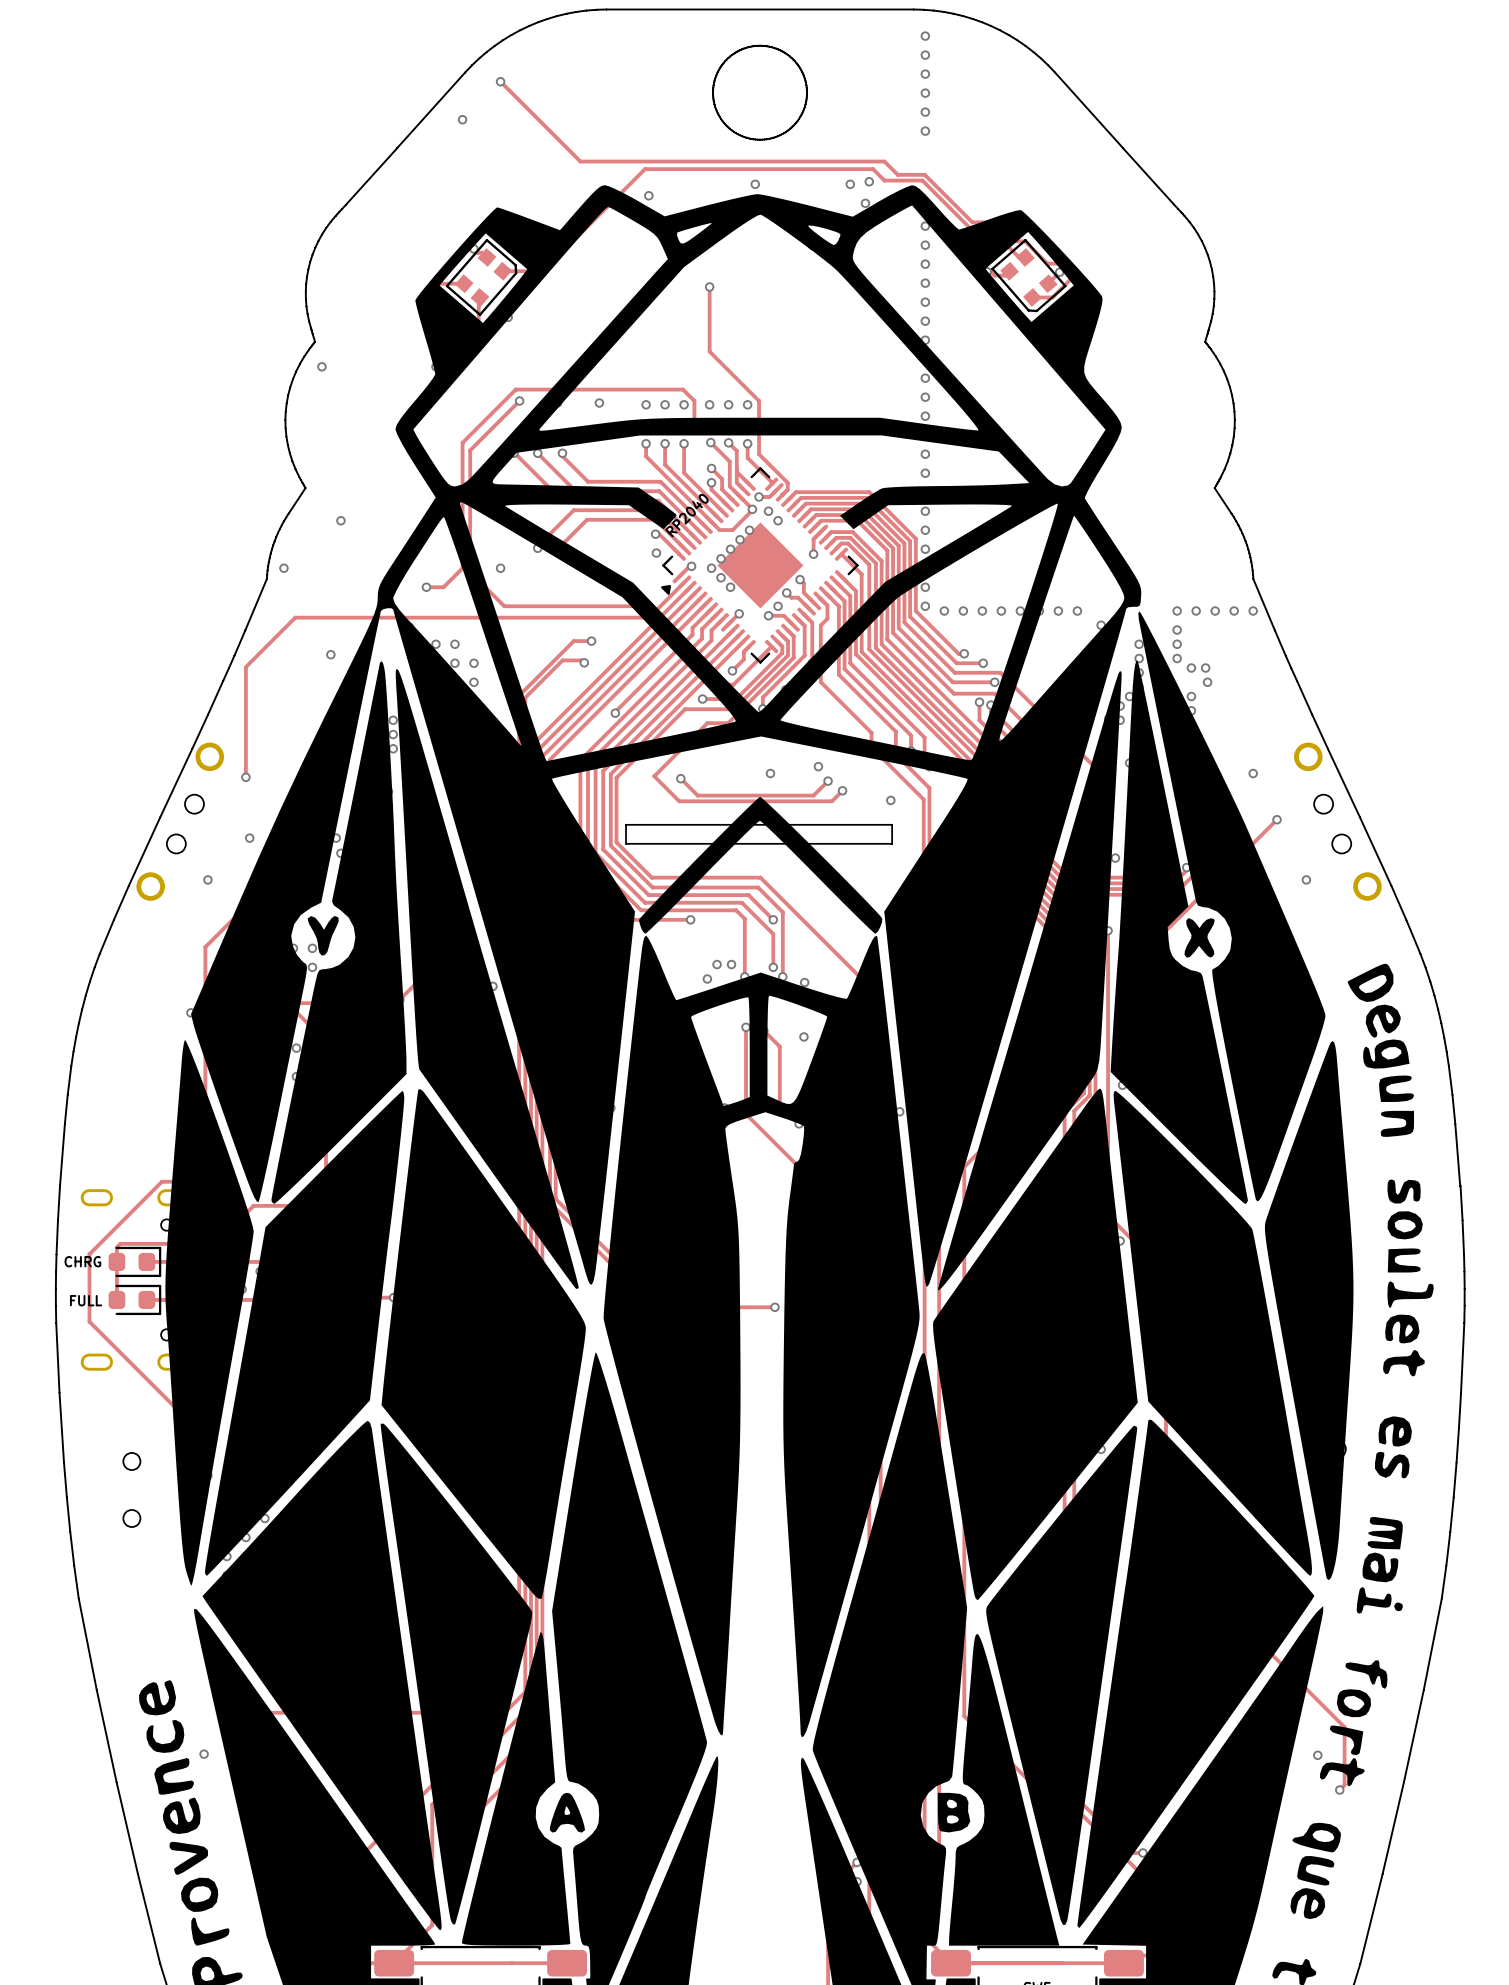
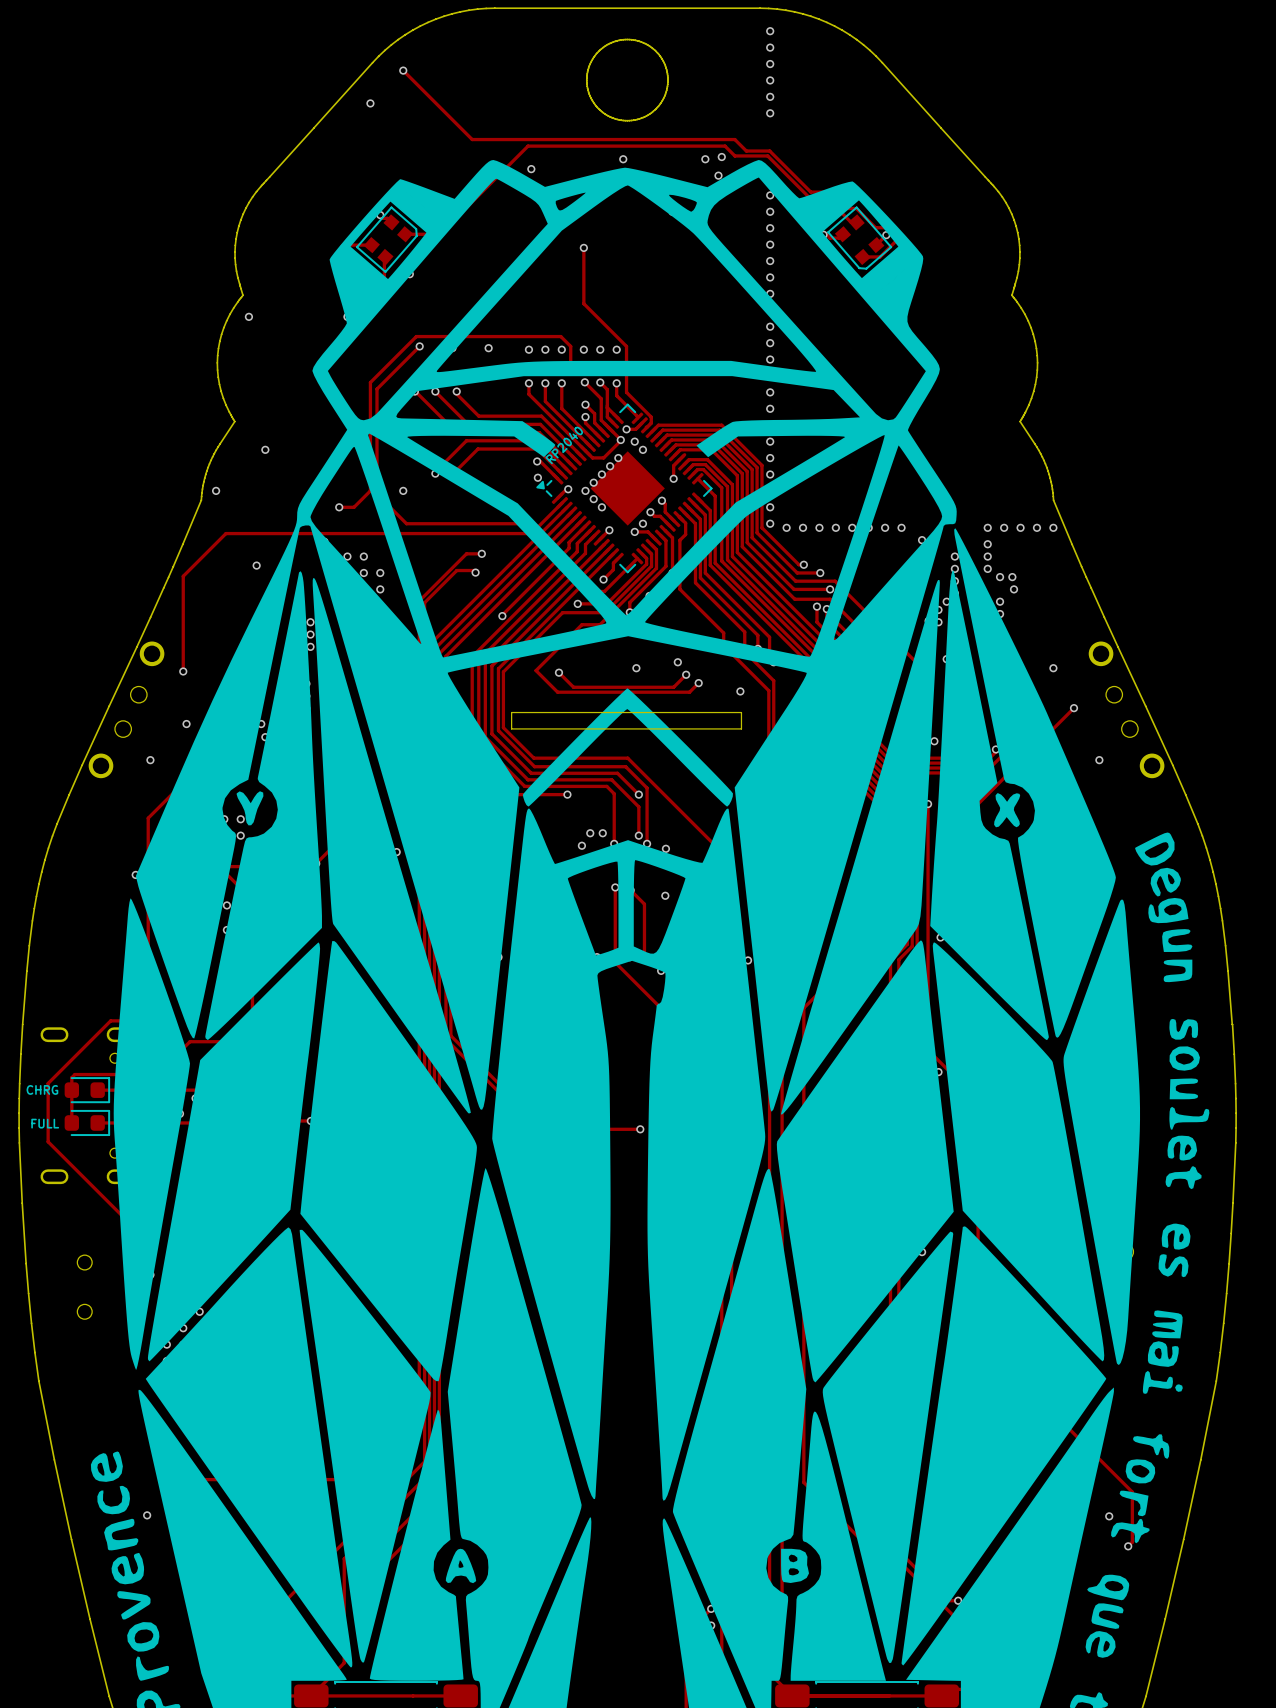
part footprint: [661, 467, 859, 664] -> [536, 403, 713, 574]

